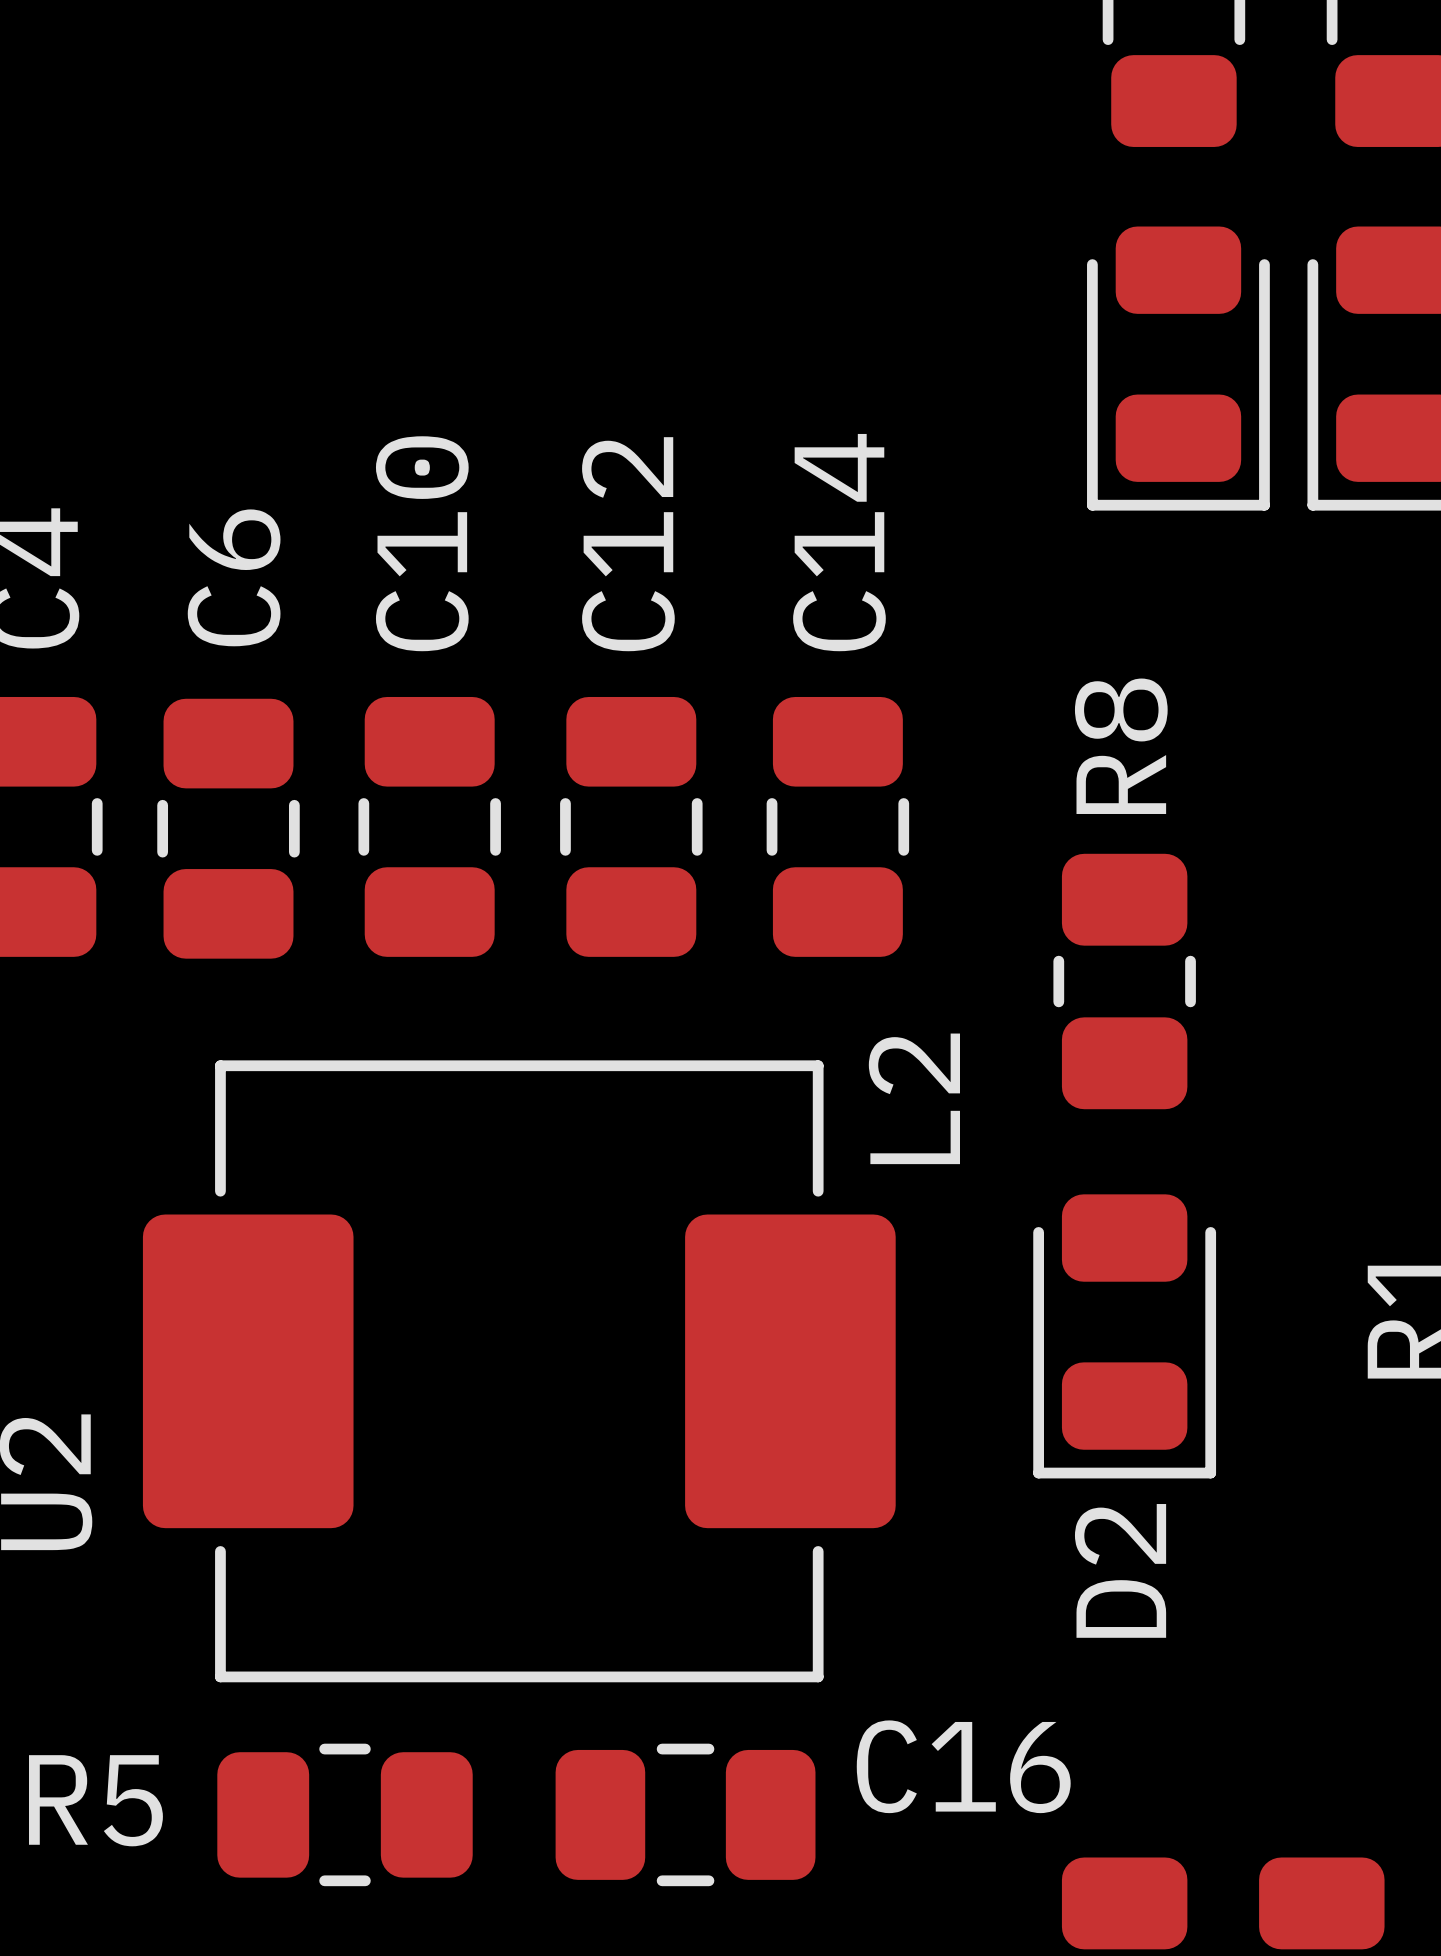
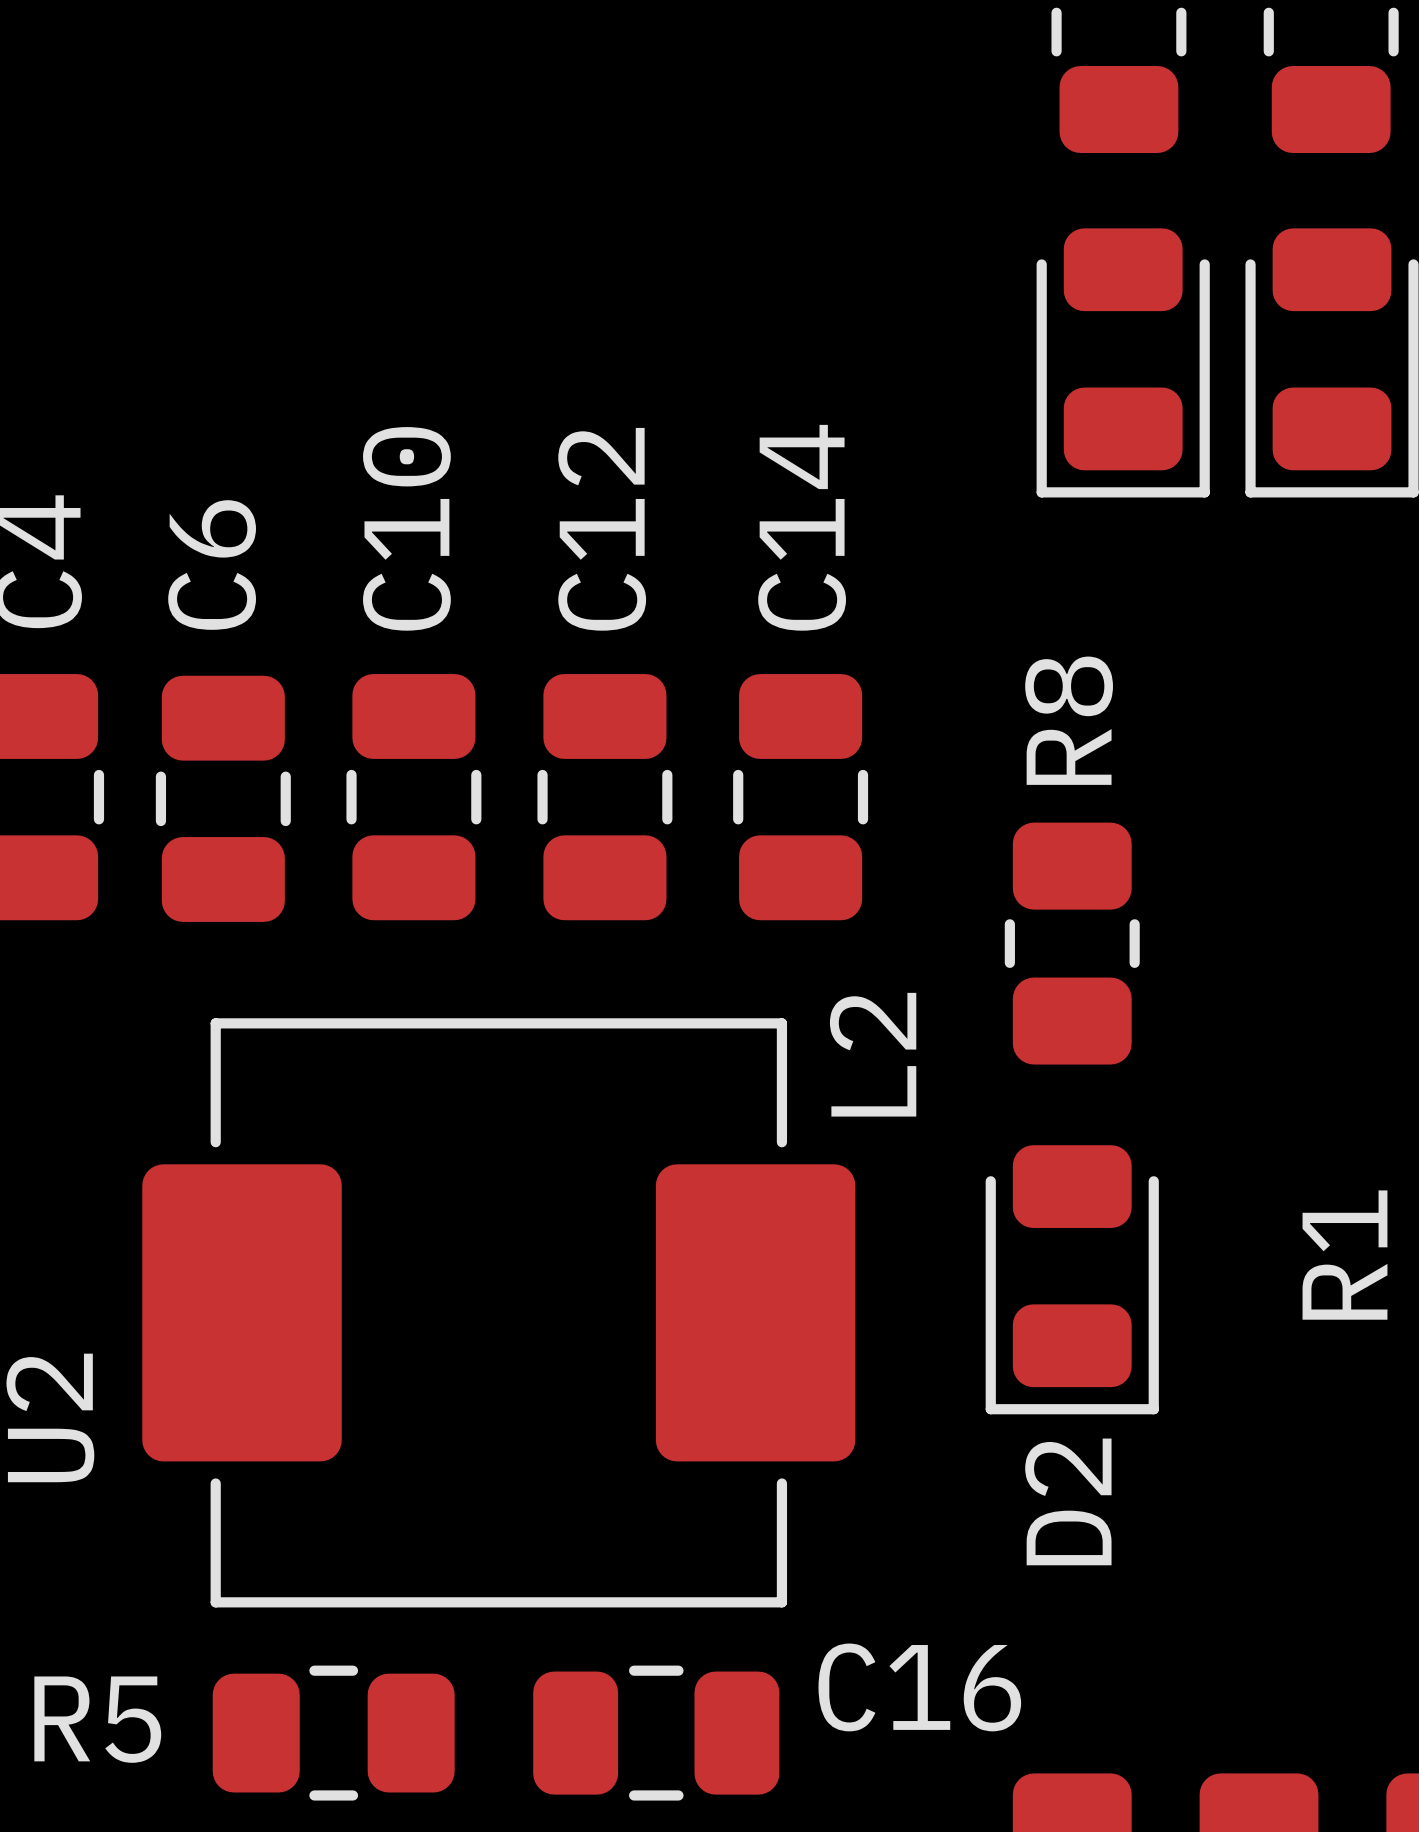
C6 name position: C6 (234, 577) -> C6 (212, 565)

